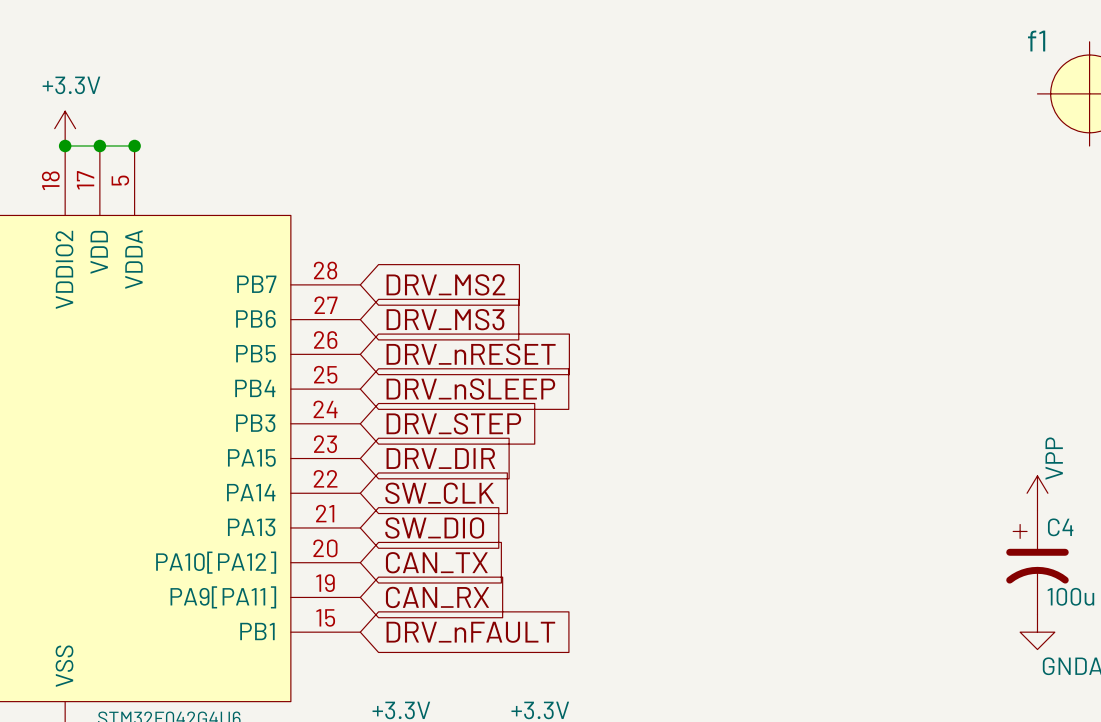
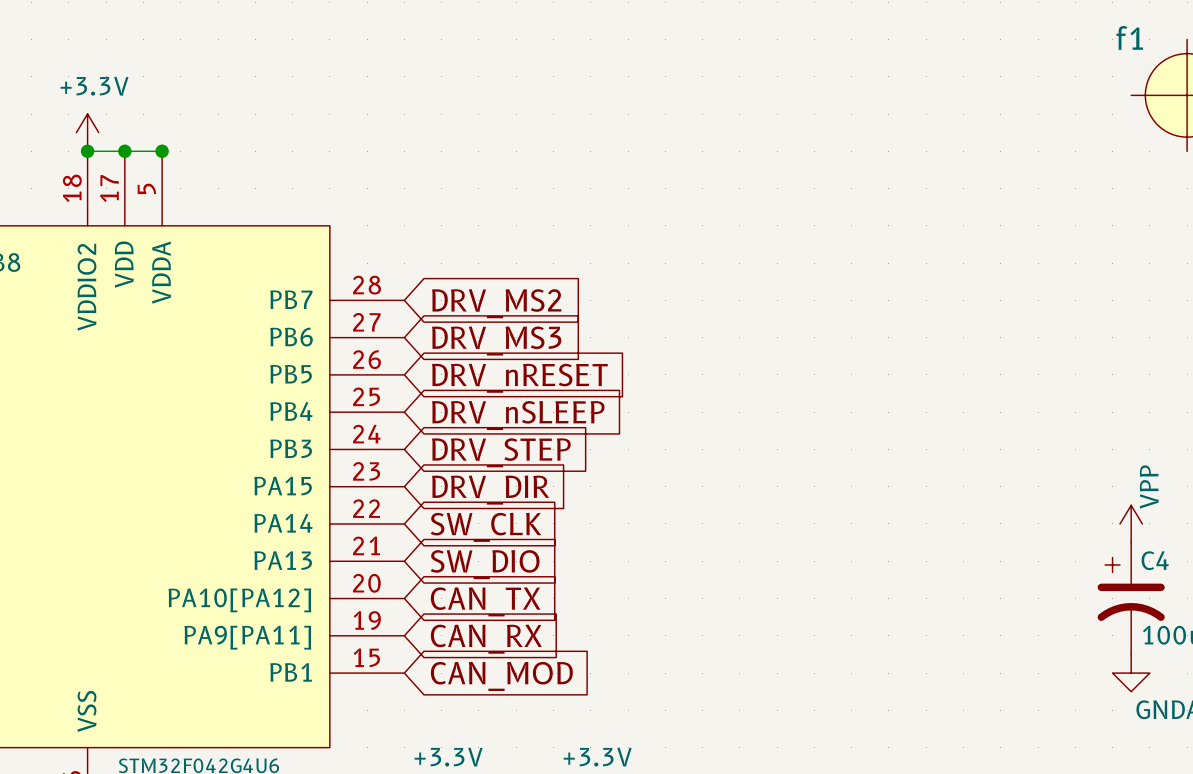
global label: DRV_nFAULT (470, 632) -> CAN_MOD (501, 676)

